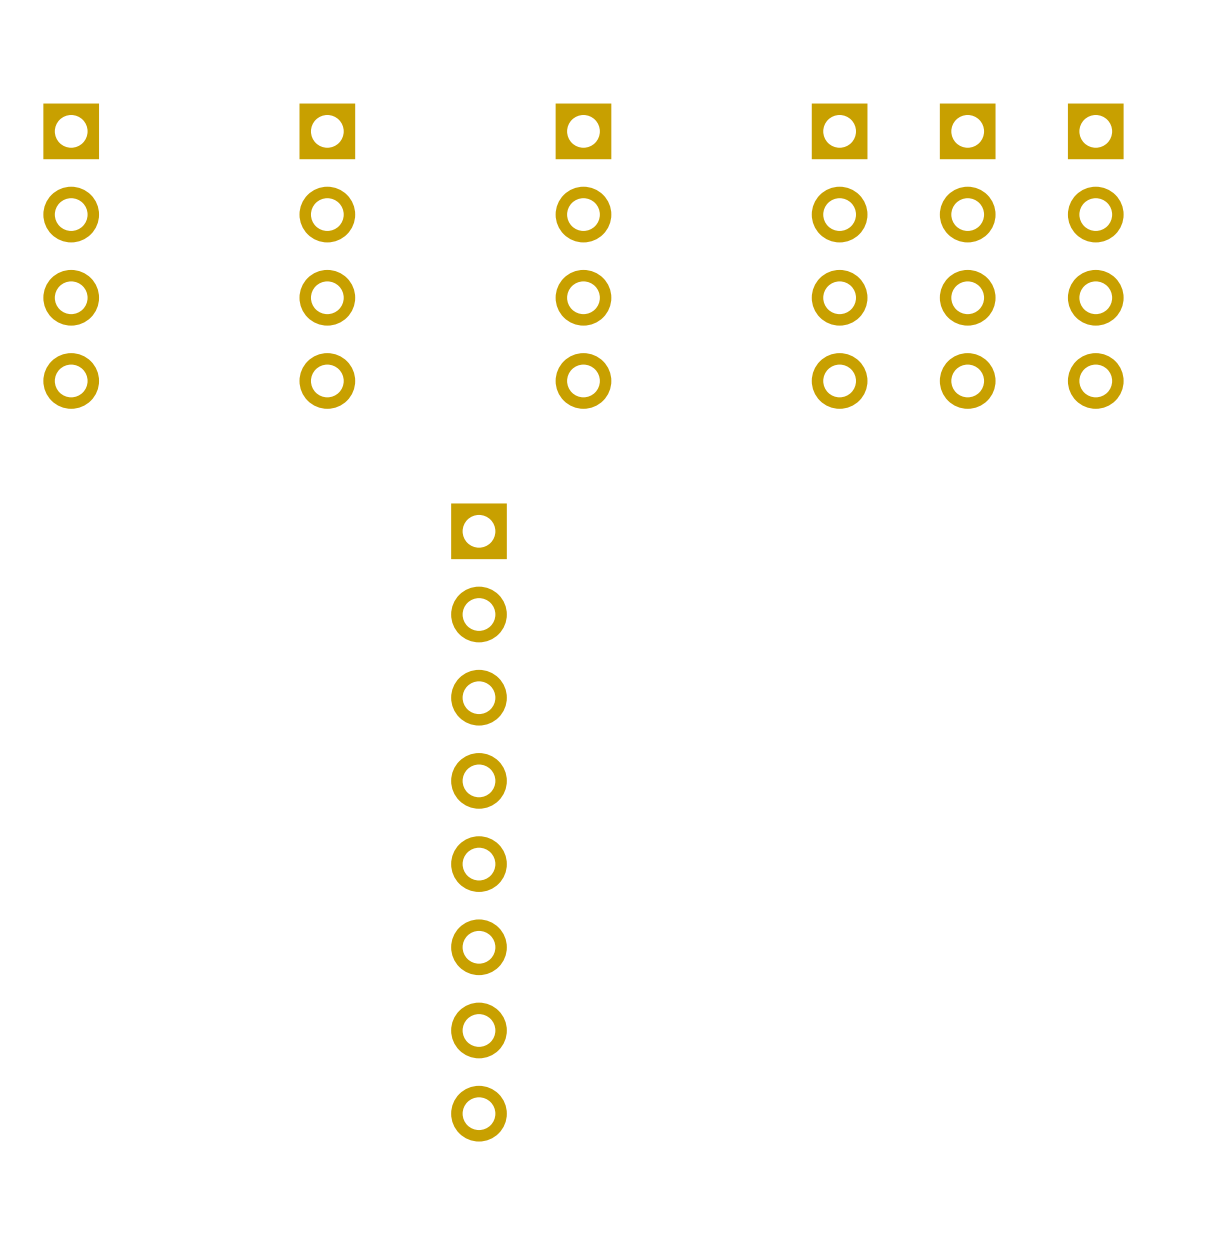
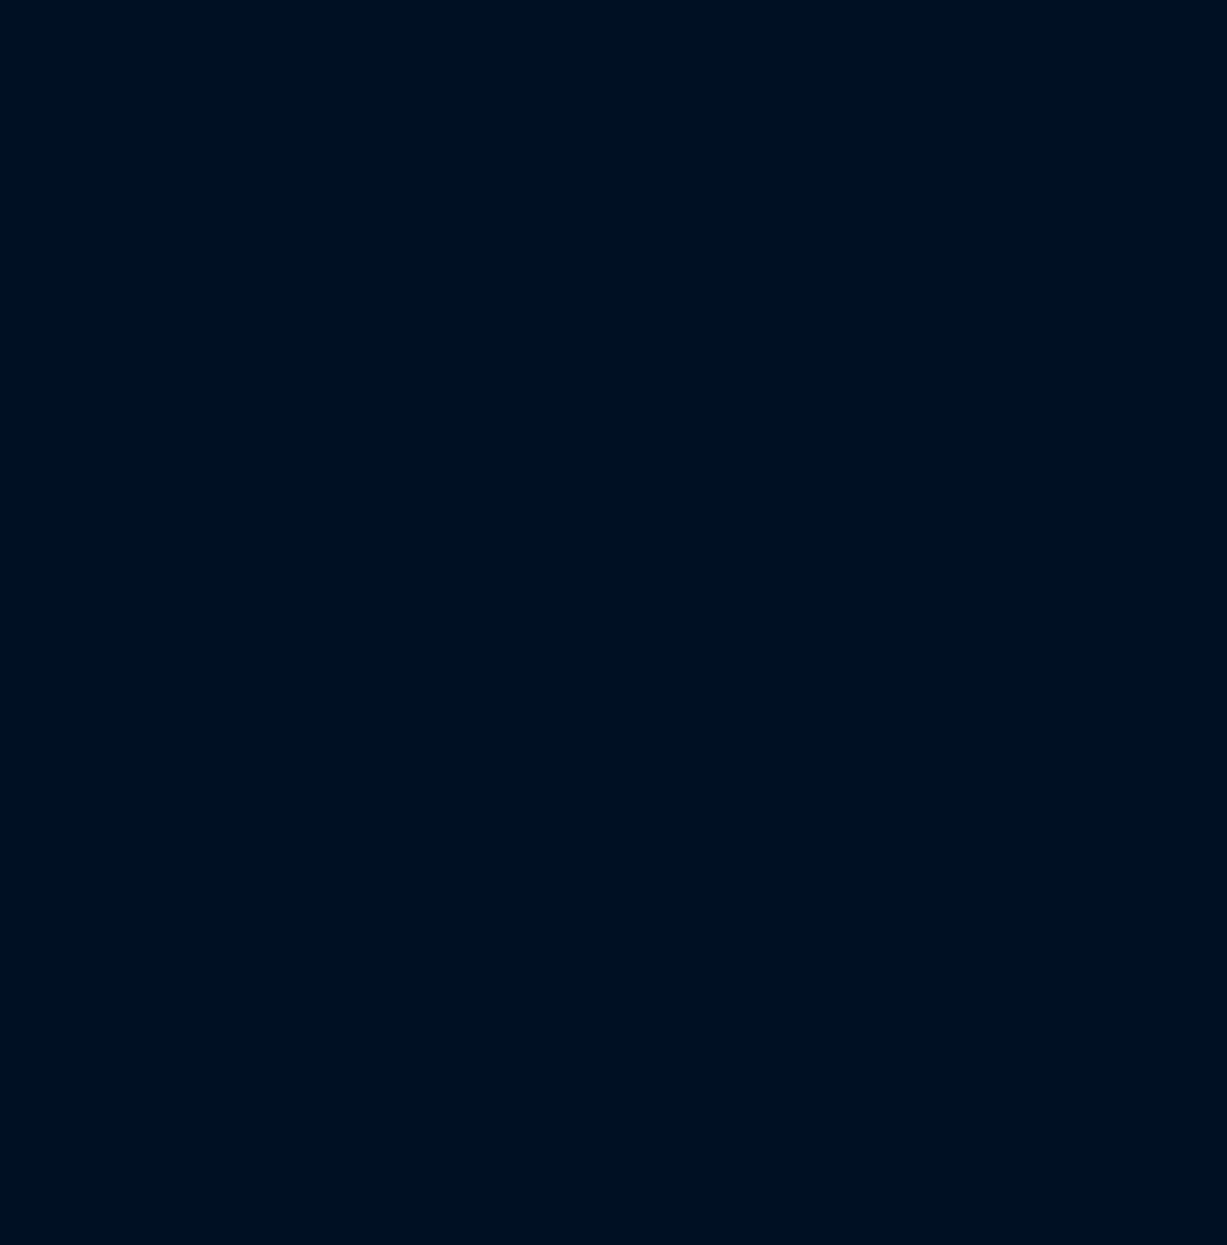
part: (71, 256) -> none
part: (327, 256) -> none
part: (583, 256) -> none
part: (839, 256) -> none
part: (967, 256) -> none
part: (1095, 256) -> none
part: (478, 822) -> none

